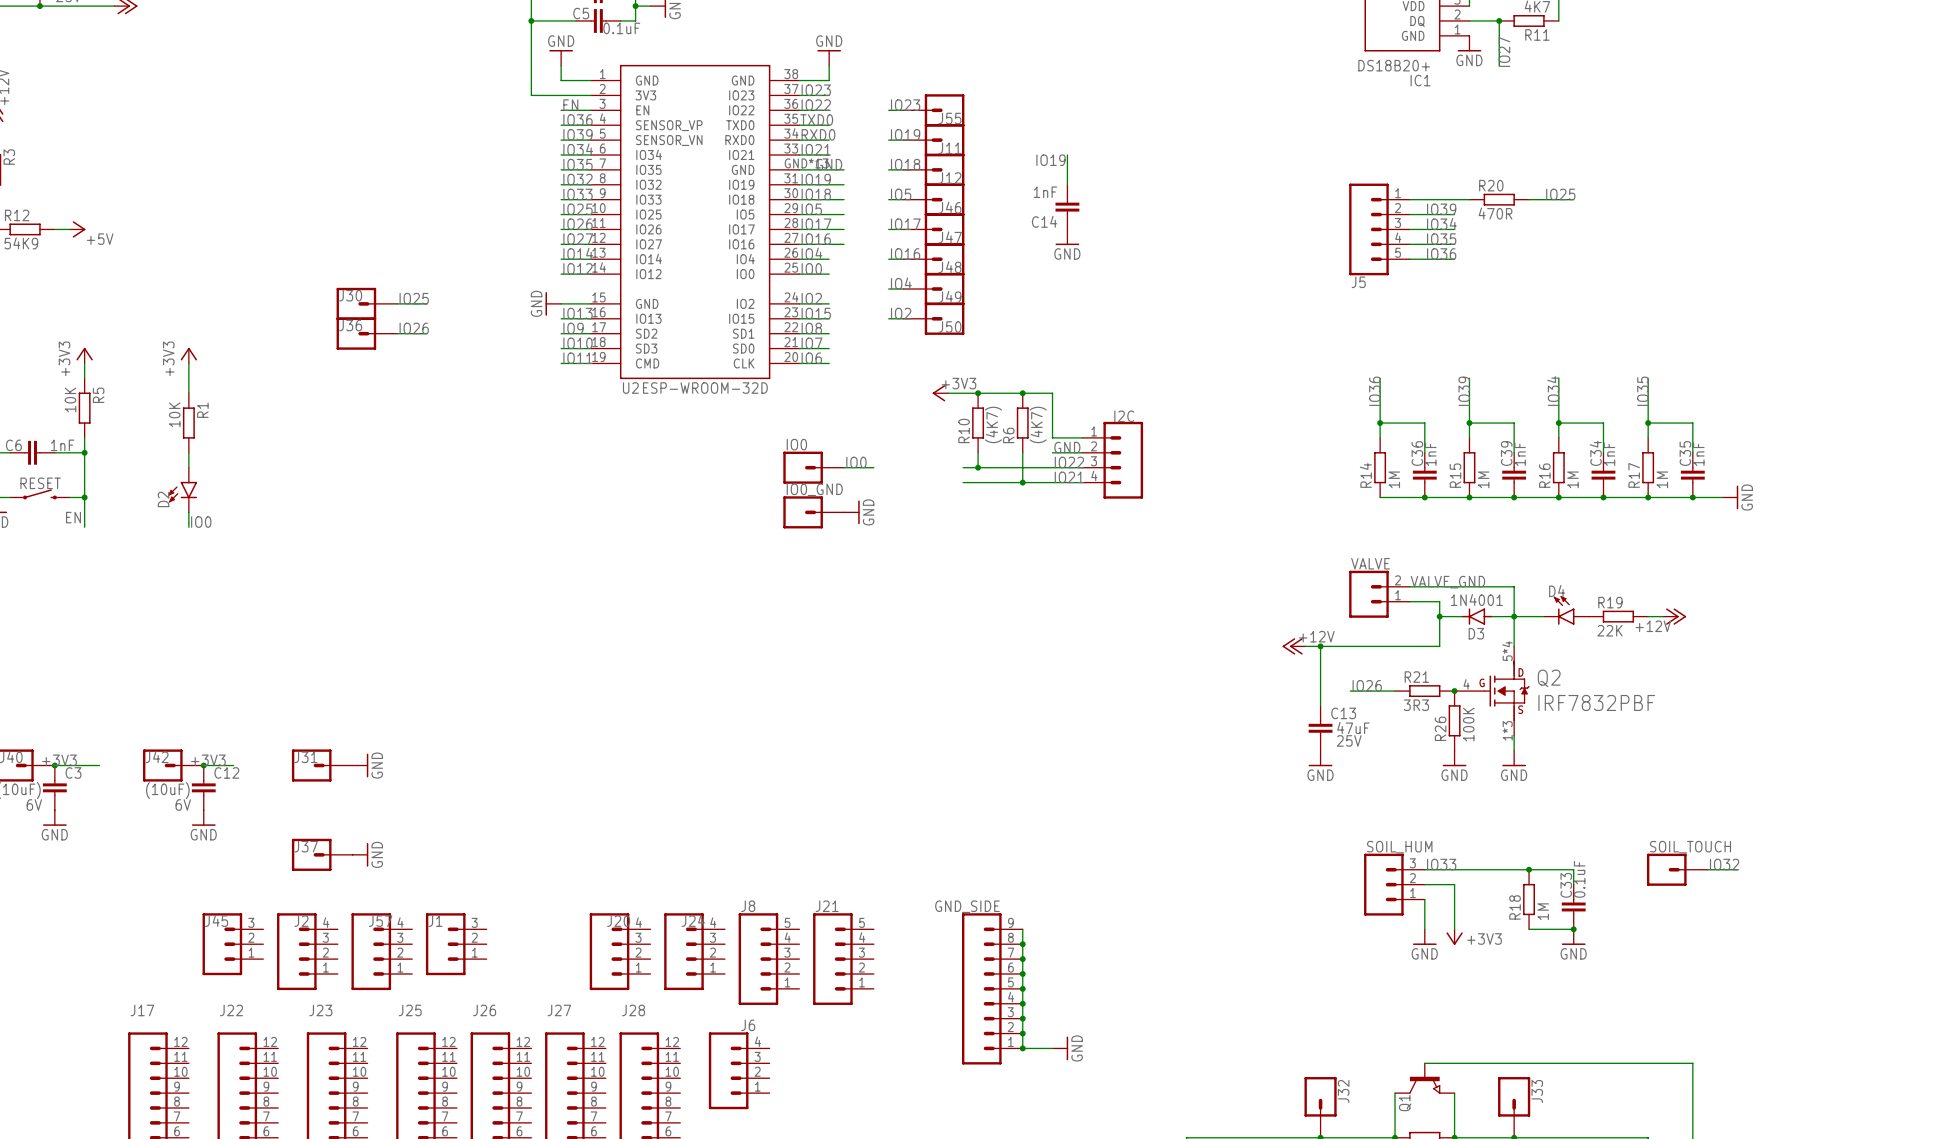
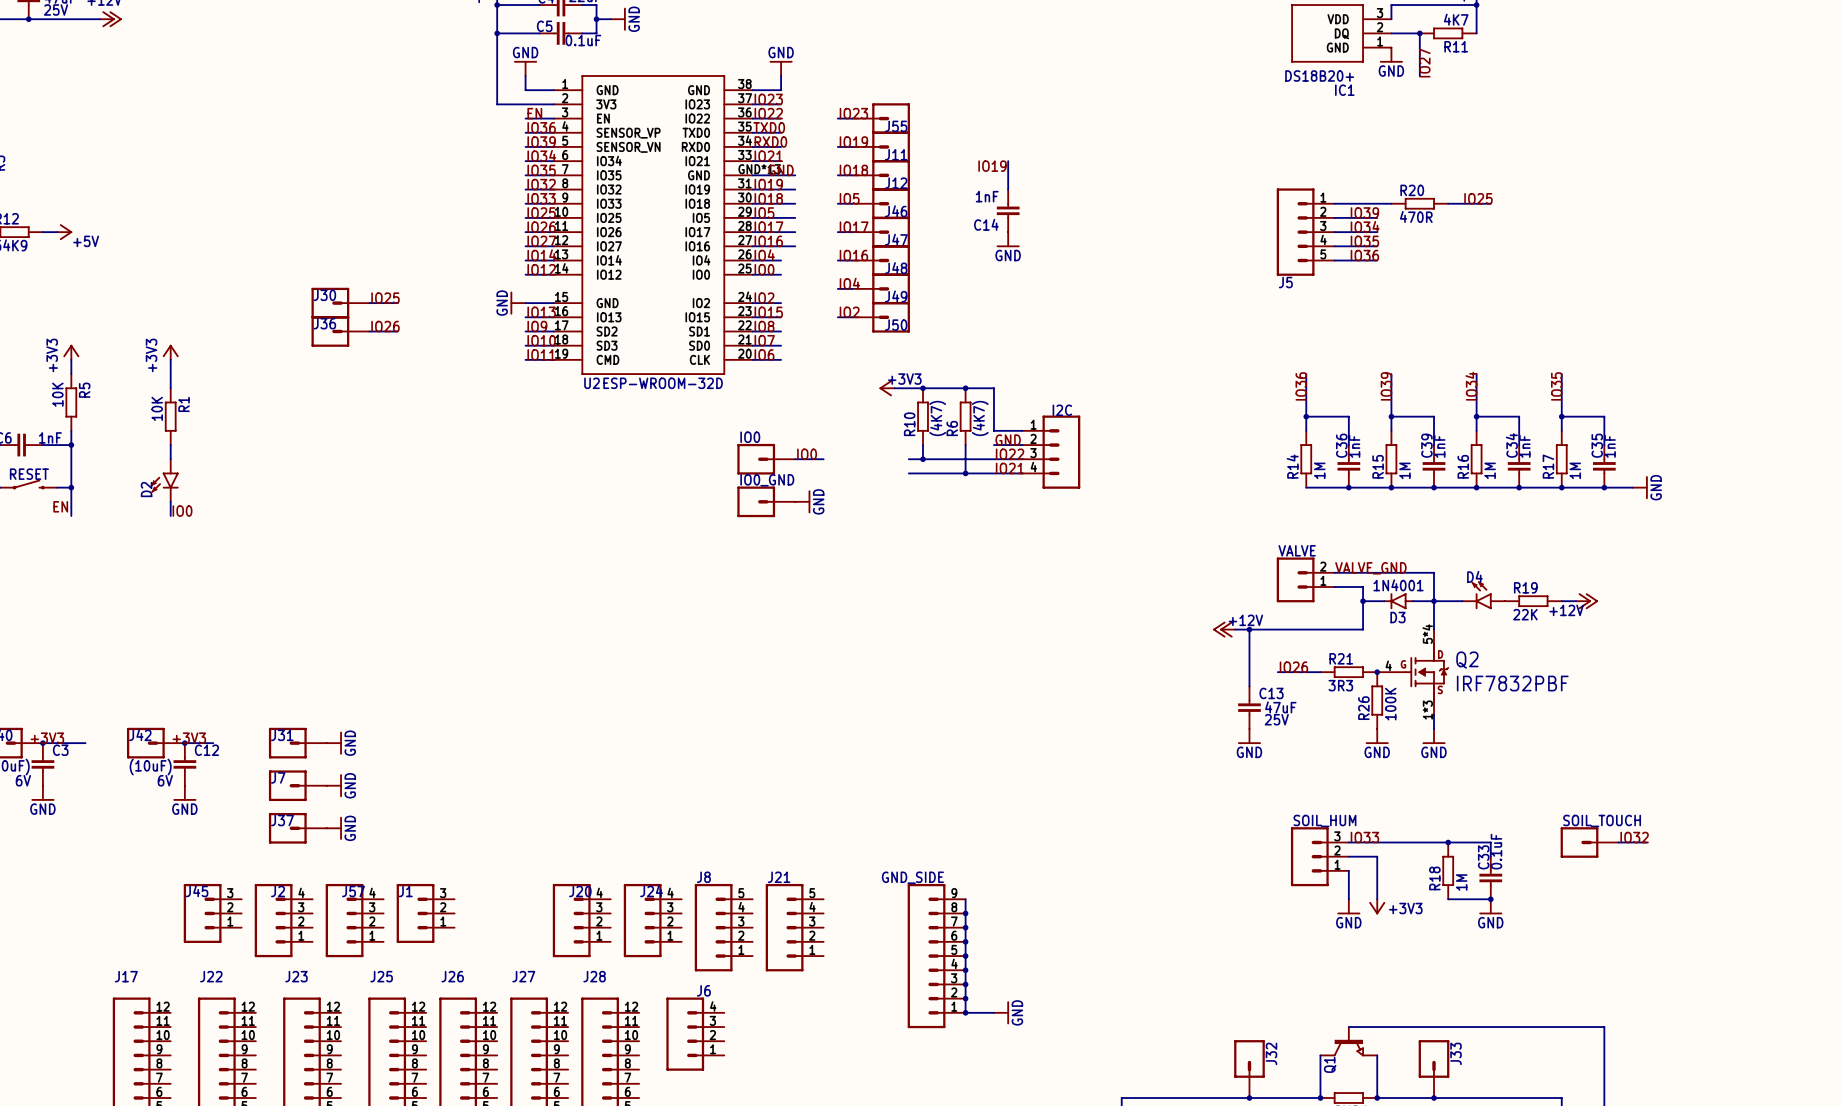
J7: none -> (297, 785)
power symbol: none -> GND (334, 785)

